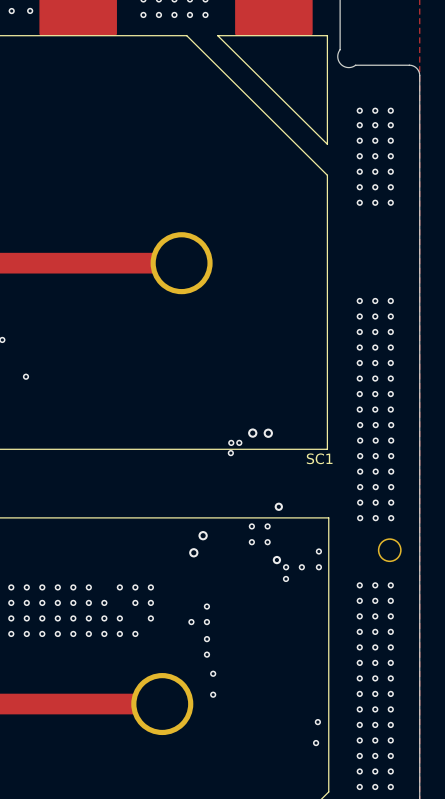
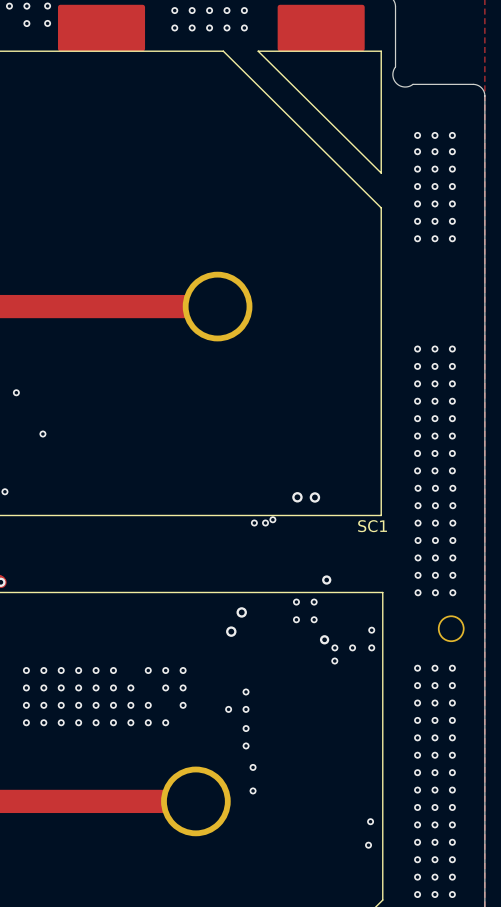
via: (231, 442) -> none
via: (239, 442) -> none
via: none -> (254, 522)
via: none -> (265, 522)

